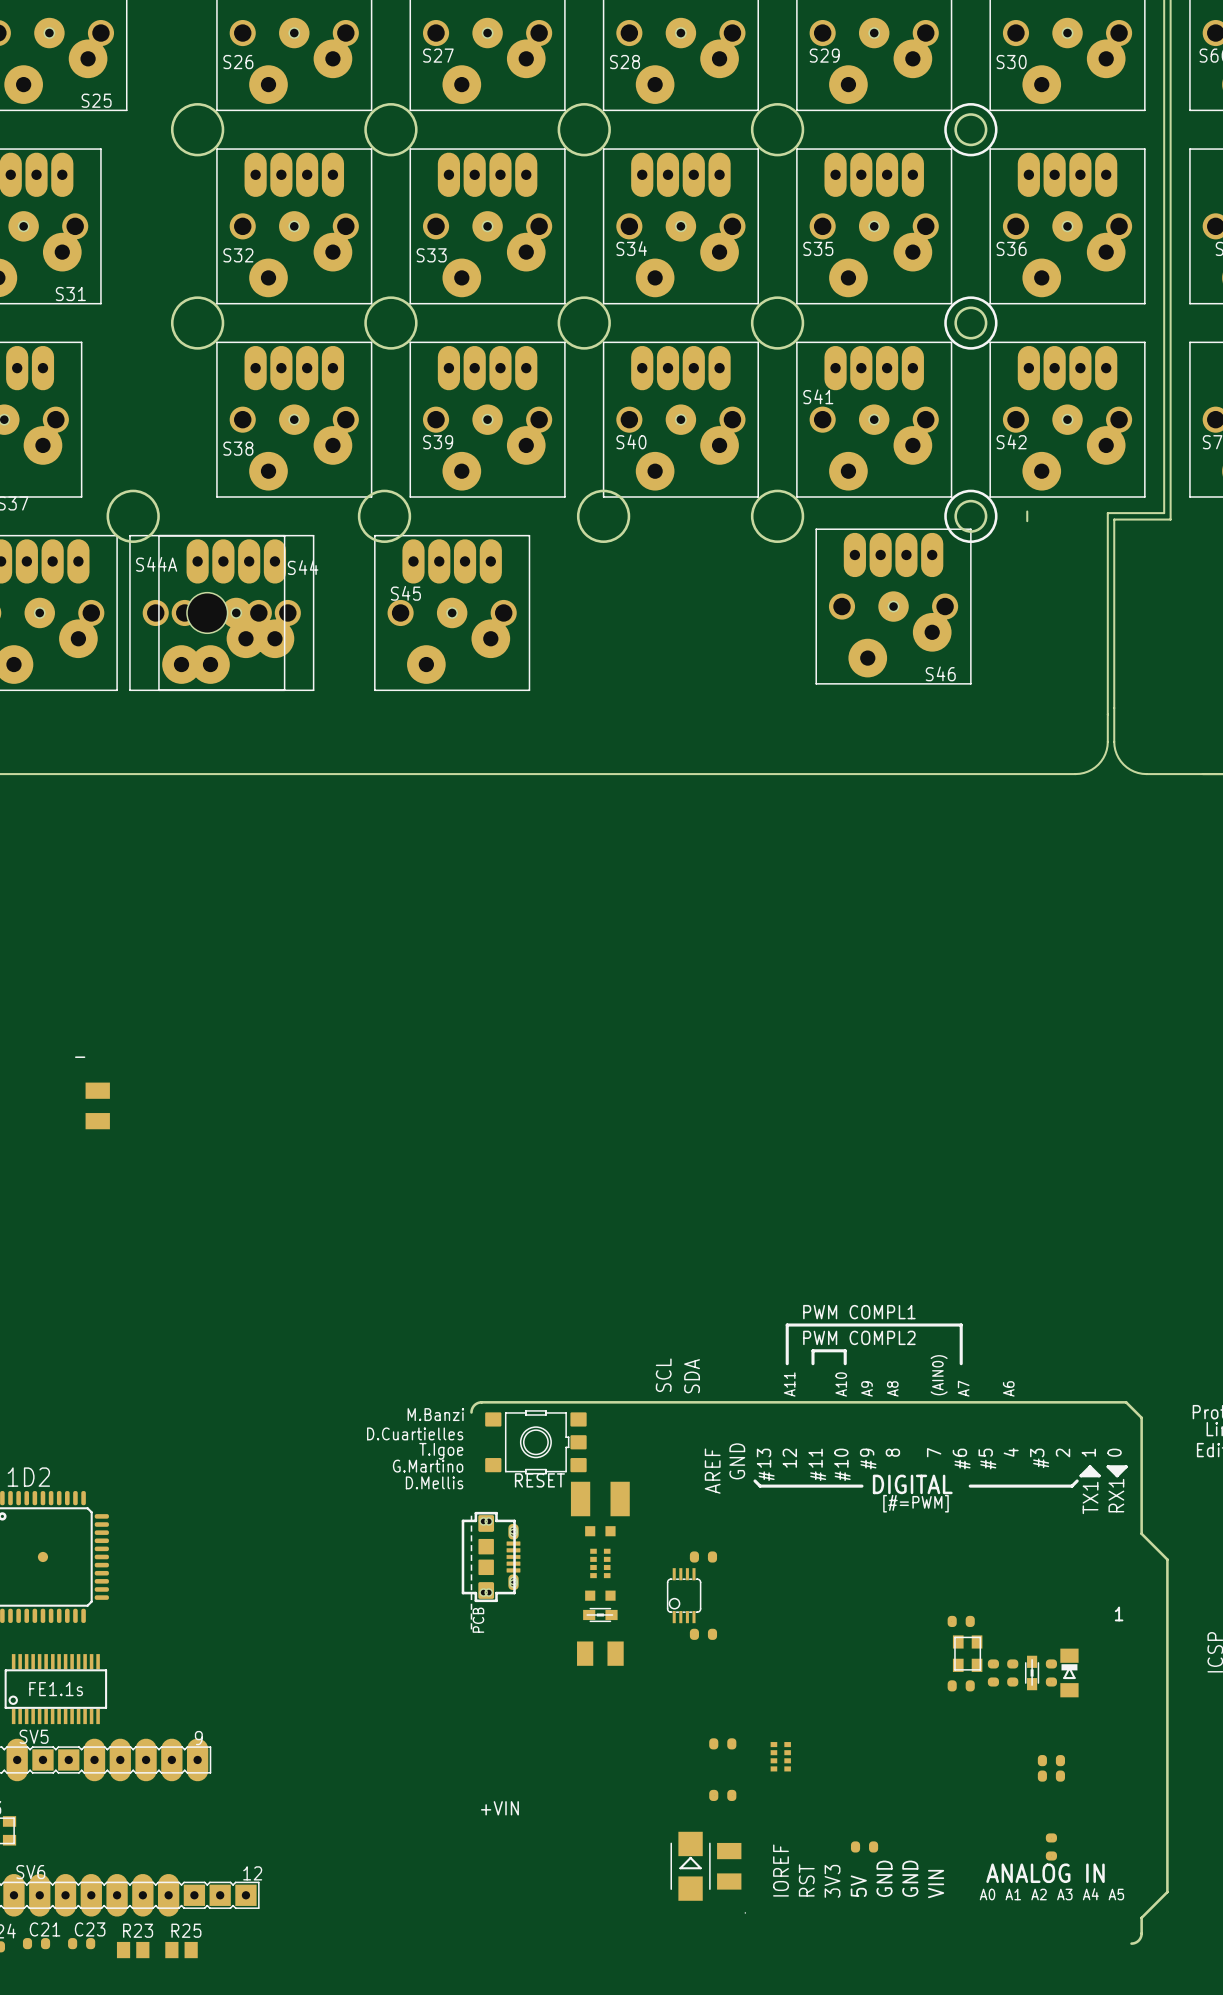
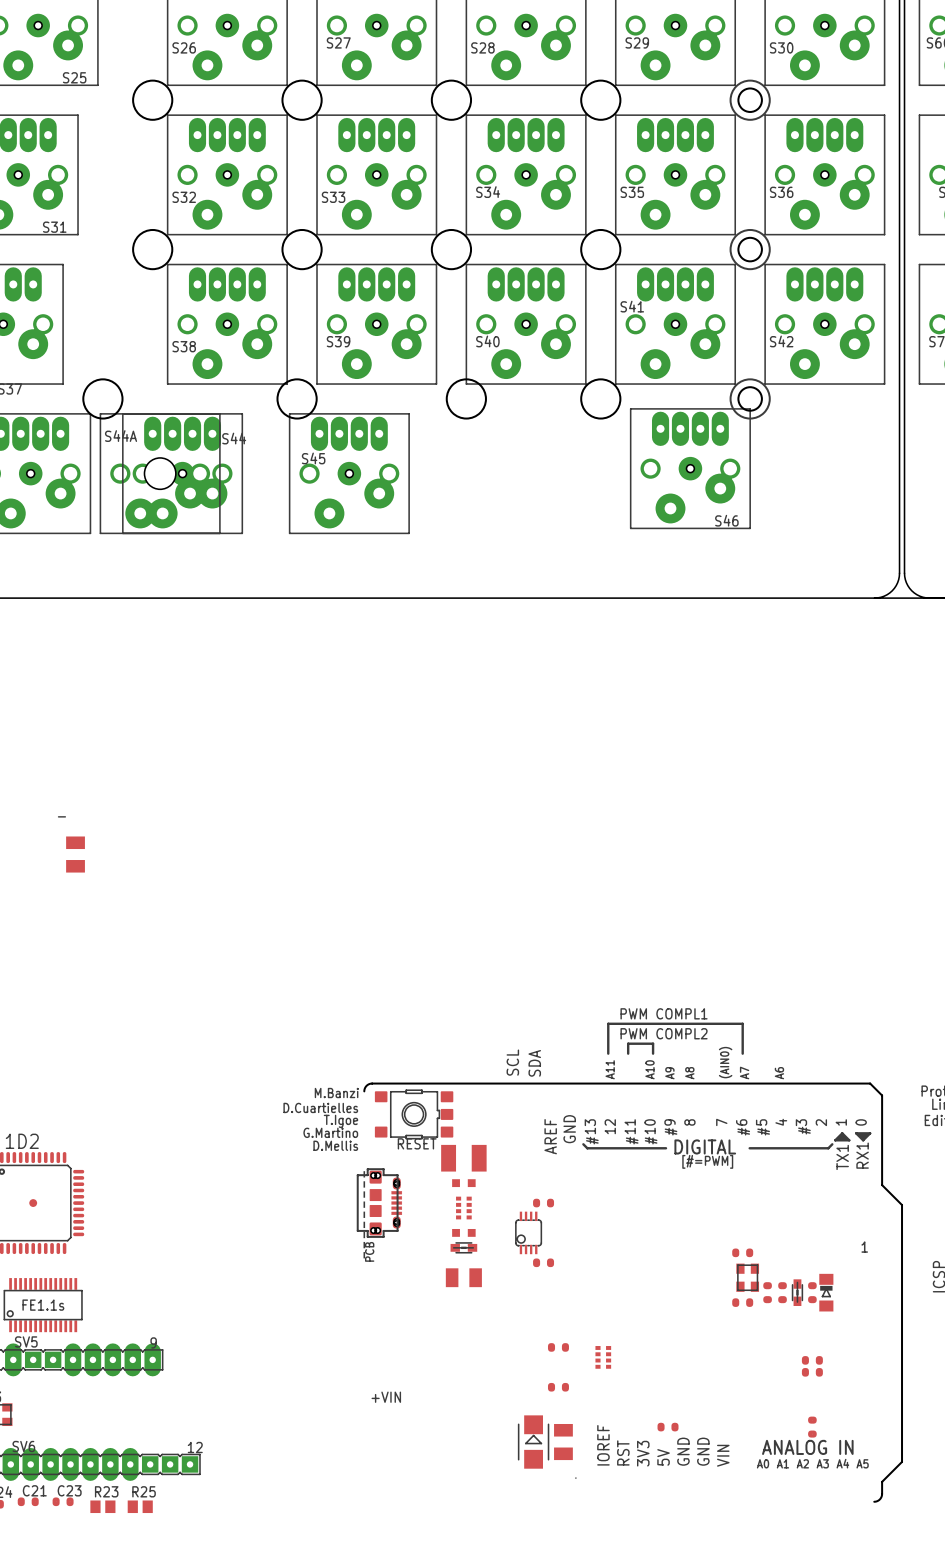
board edge: (1027, 511) (1027, 521) -> none
board edge: (1164, 513) (1107, 513) (1107, 746) (1103, 757) (1095, 767) (1087, 771) (1075, 774) -> (899, 396) (899, 576) (892, 590) (884, 596) (874, 598)
board edge: (1170, 519) (1114, 519) (1114, 746) (1118, 757) (1126, 767) (1134, 771) (1146, 774) -> (904, 401) (904, 576) (911, 590) (919, 596) (929, 598)
board edge: none -> (831, 598) (885, 598)

